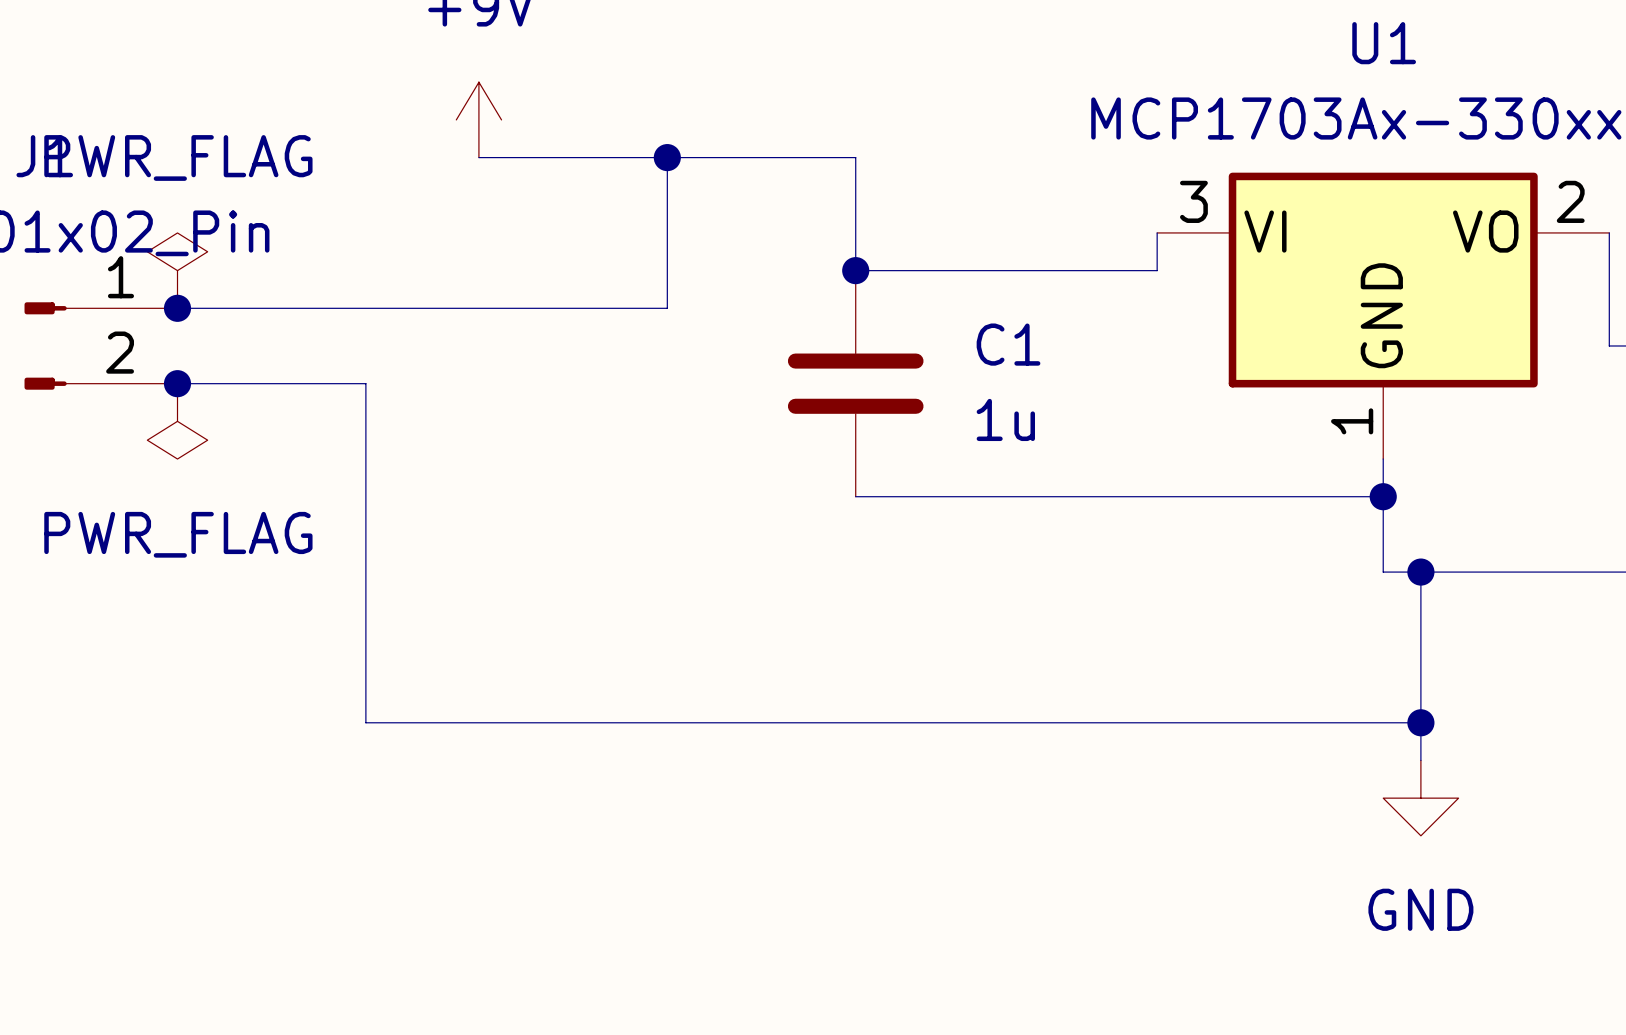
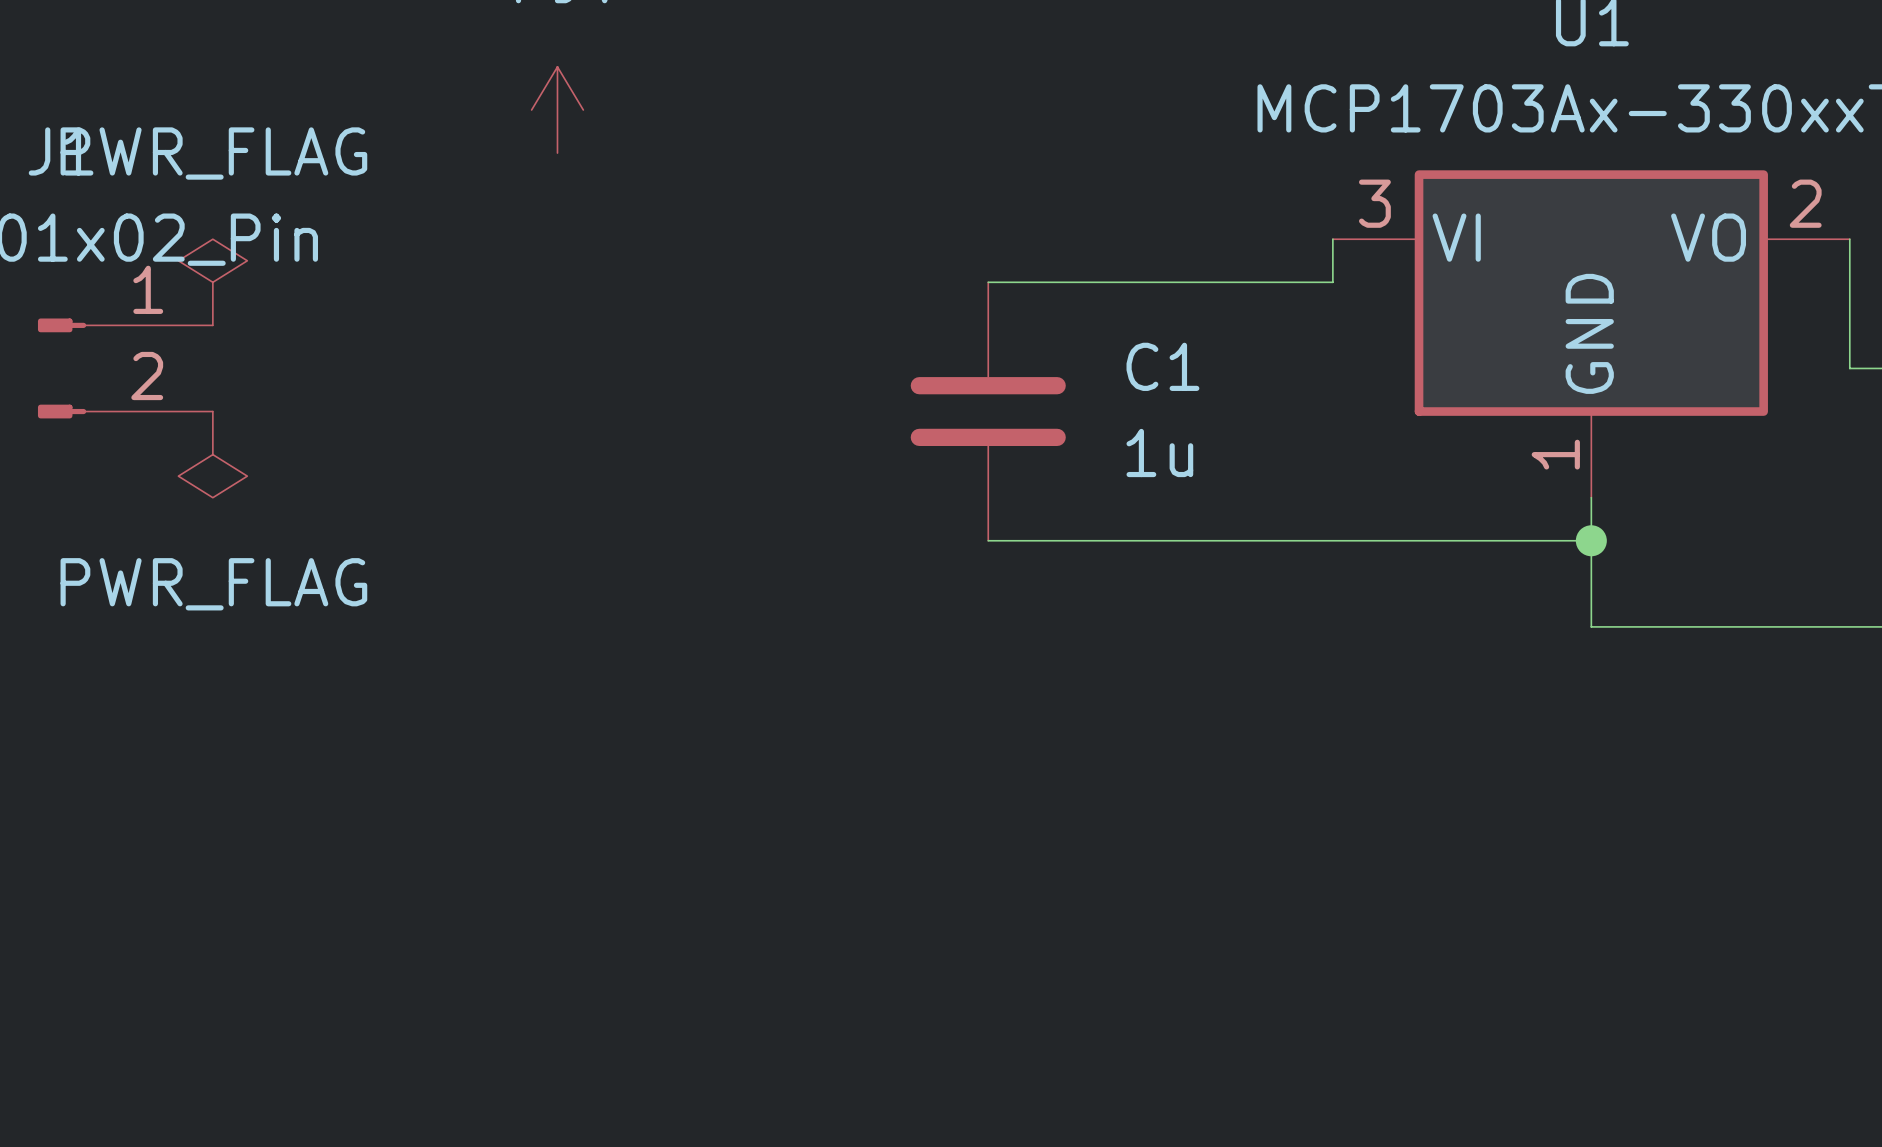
wire: (478, 157) (855, 157) (855, 270) -> none
wire: (667, 157) (667, 308) (177, 308) -> none
junction: (667, 157) -> none
junction: (855, 270) -> none
junction: (177, 308) -> none
wire: (177, 383) (365, 383) (365, 722) (1420, 722) -> none
junction: (177, 383) -> none
wire: (1420, 572) (1420, 760) -> none
junction: (1420, 572) -> none
junction: (1420, 722) -> none
power symbol: GND (1420, 798) -> none

